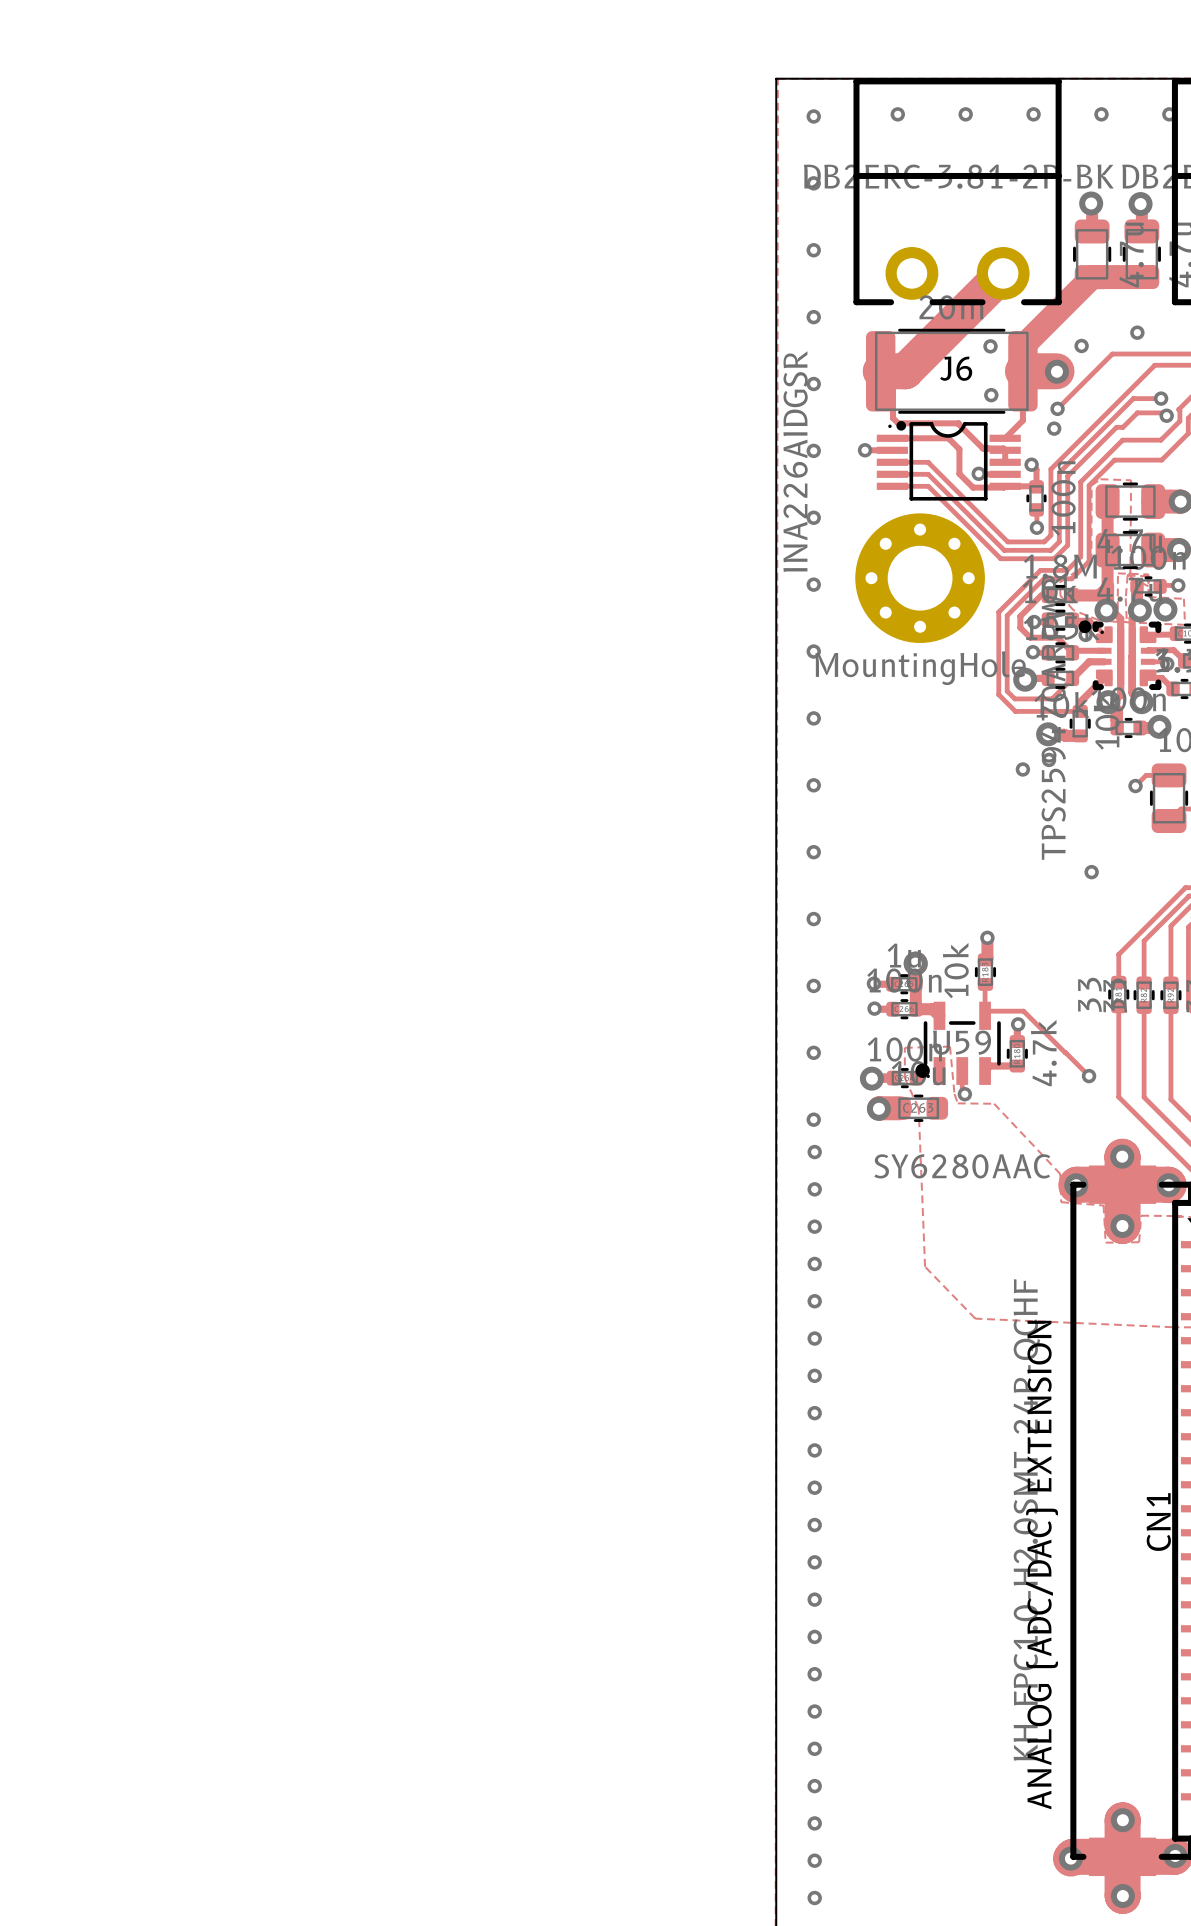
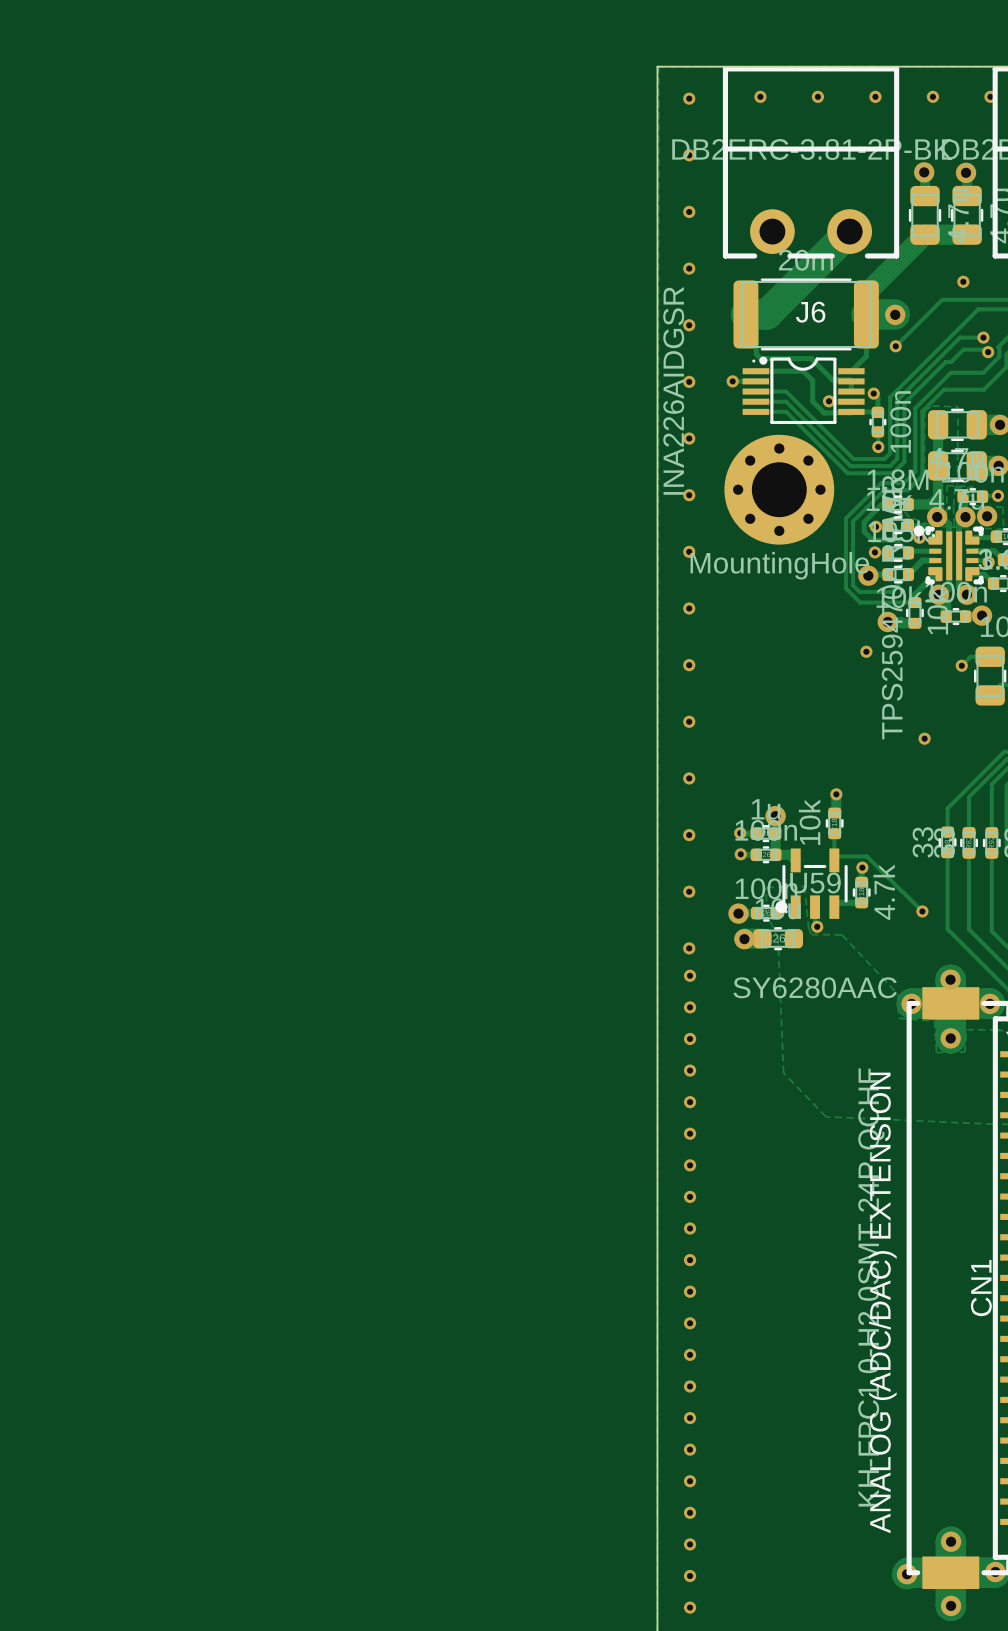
via: (1081, 345) -> none
via: (990, 346) -> none
via: (991, 395) -> none
via: (1054, 428) -> none
via: (1049, 759) -> none

